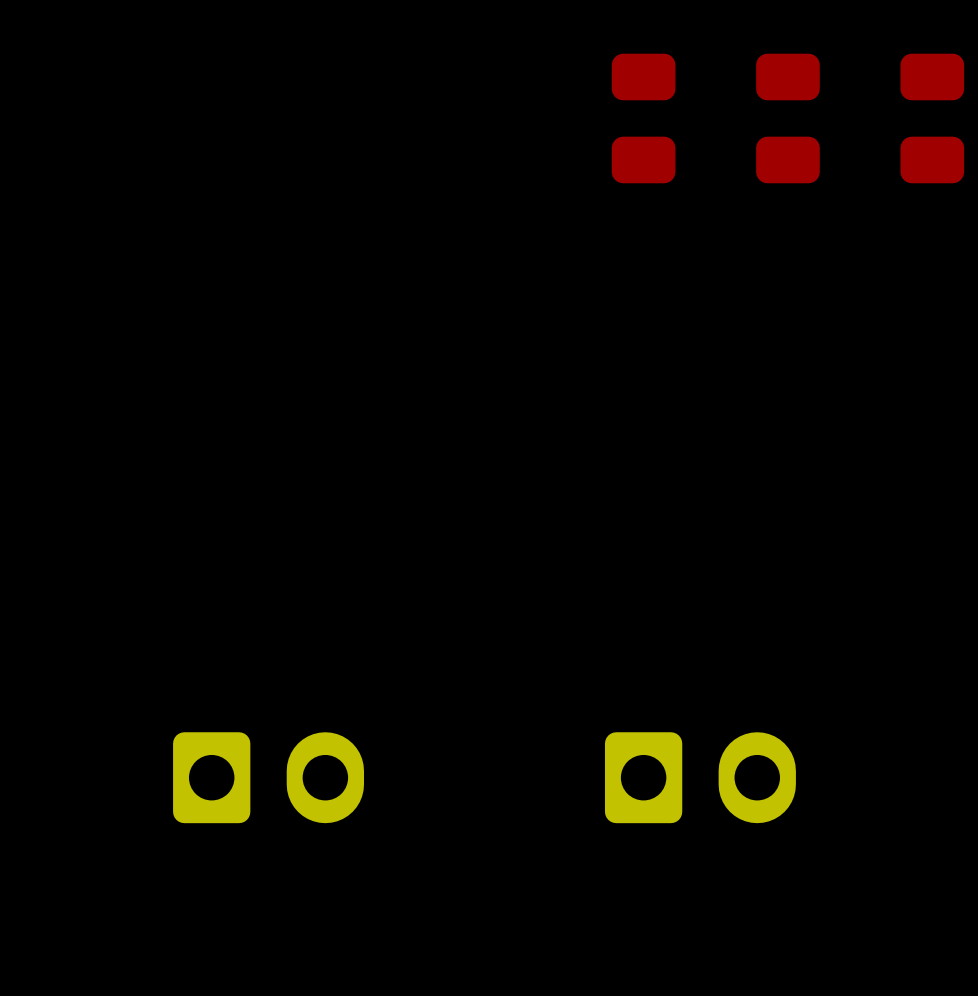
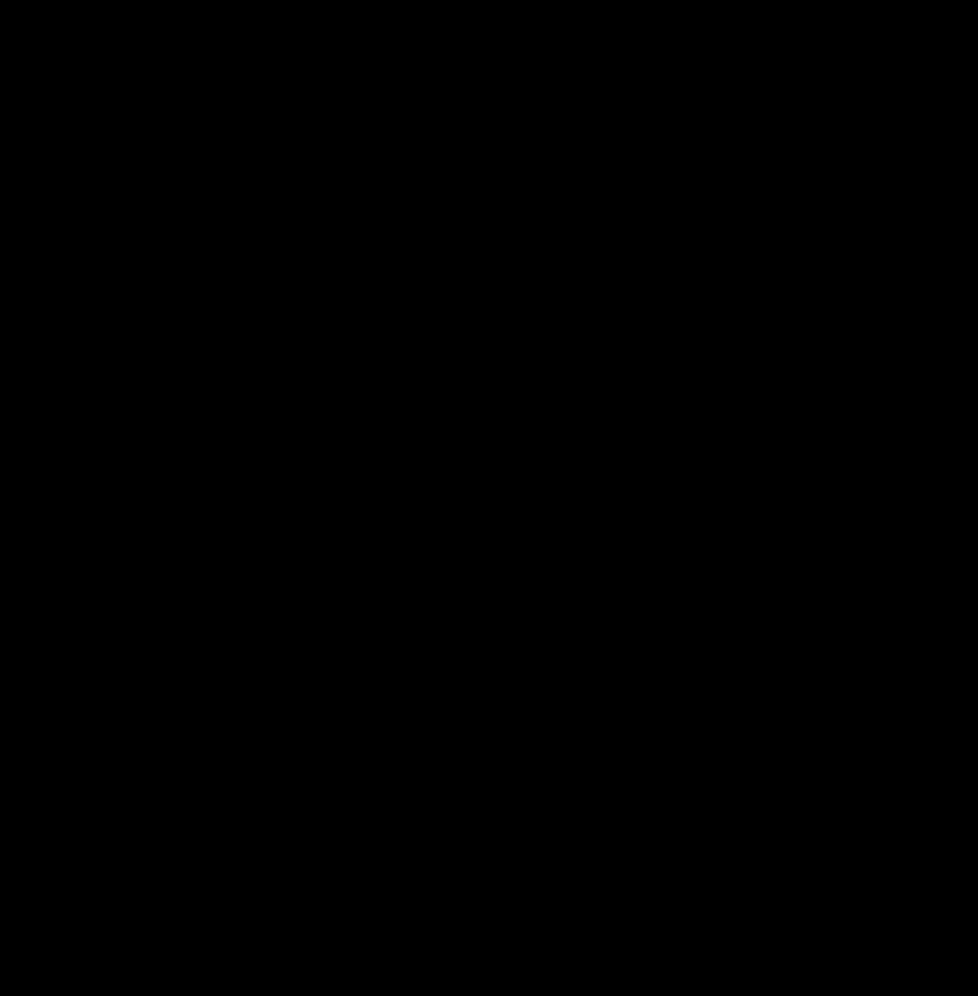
part: (643, 118) -> none
part: (787, 118) -> none
part: (932, 118) -> none
part: (268, 777) -> none
part: (700, 777) -> none

